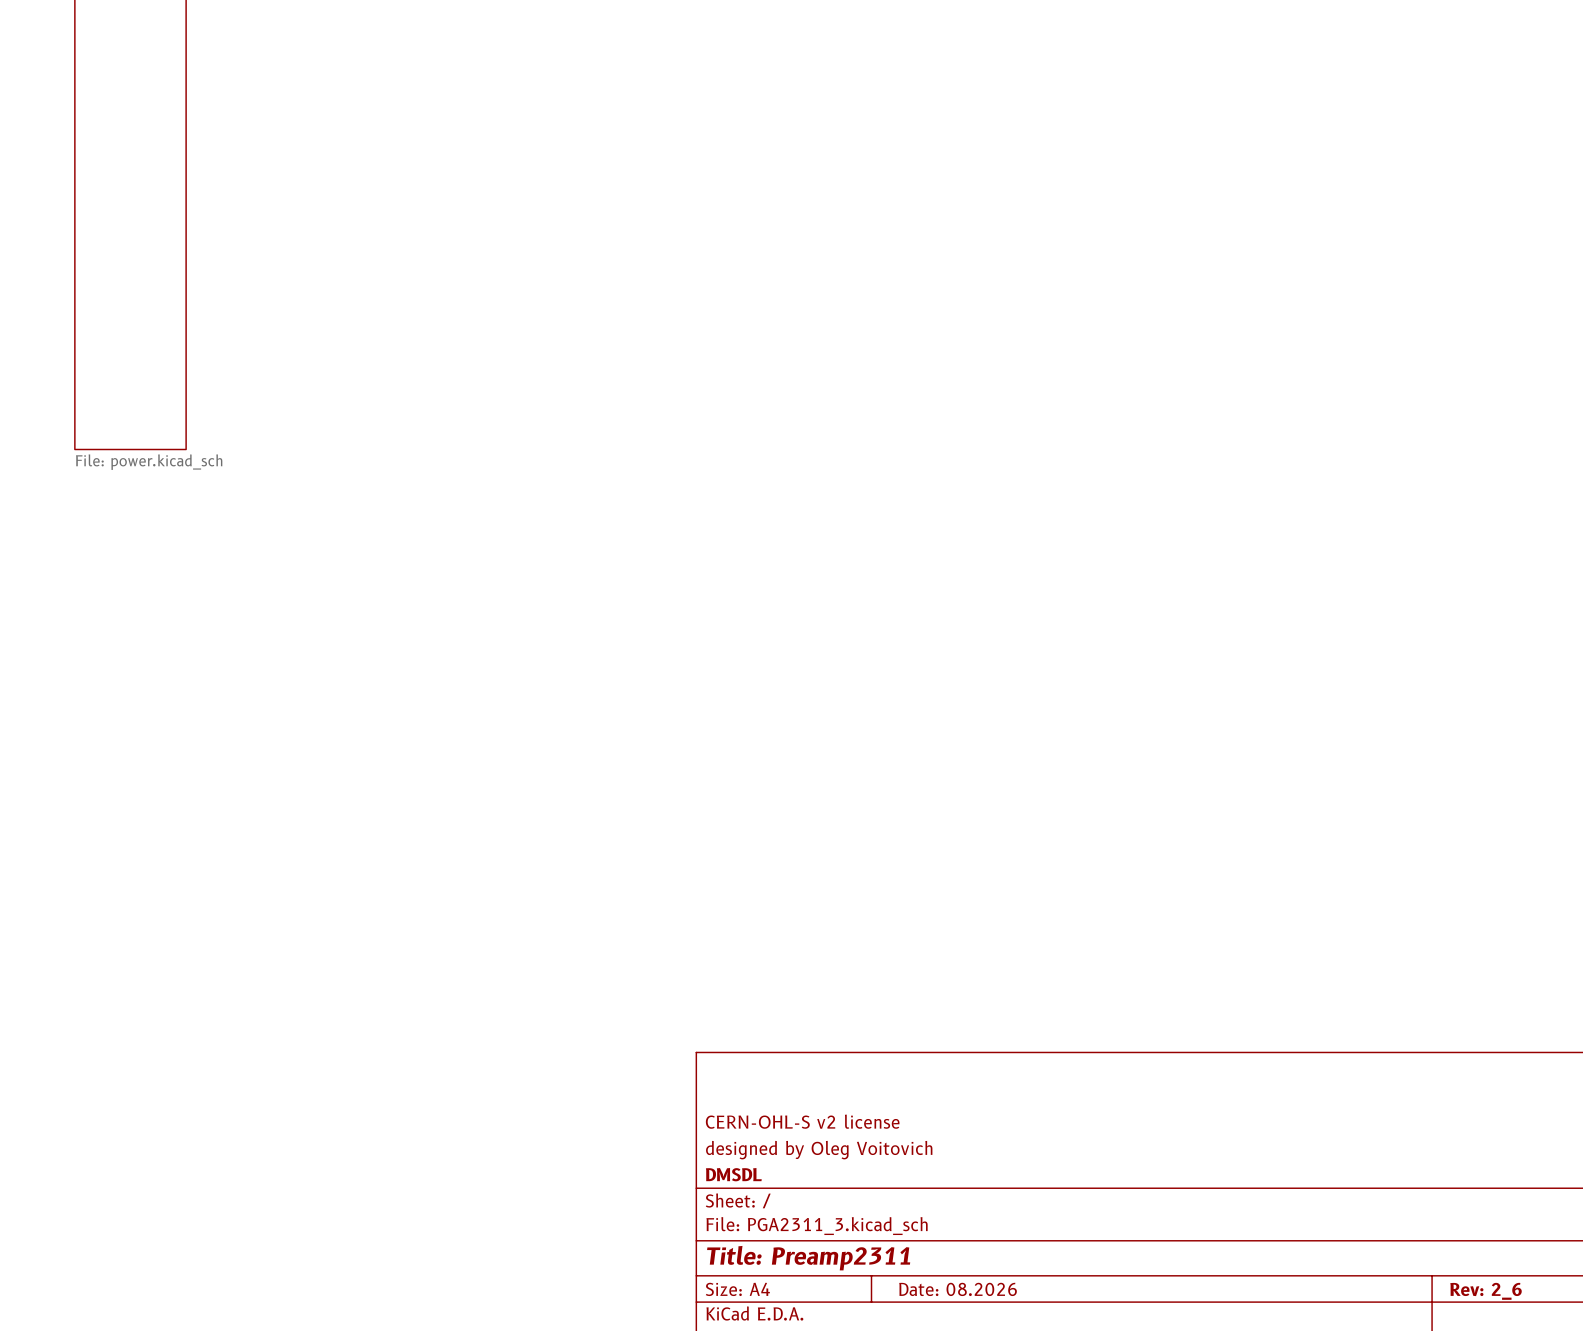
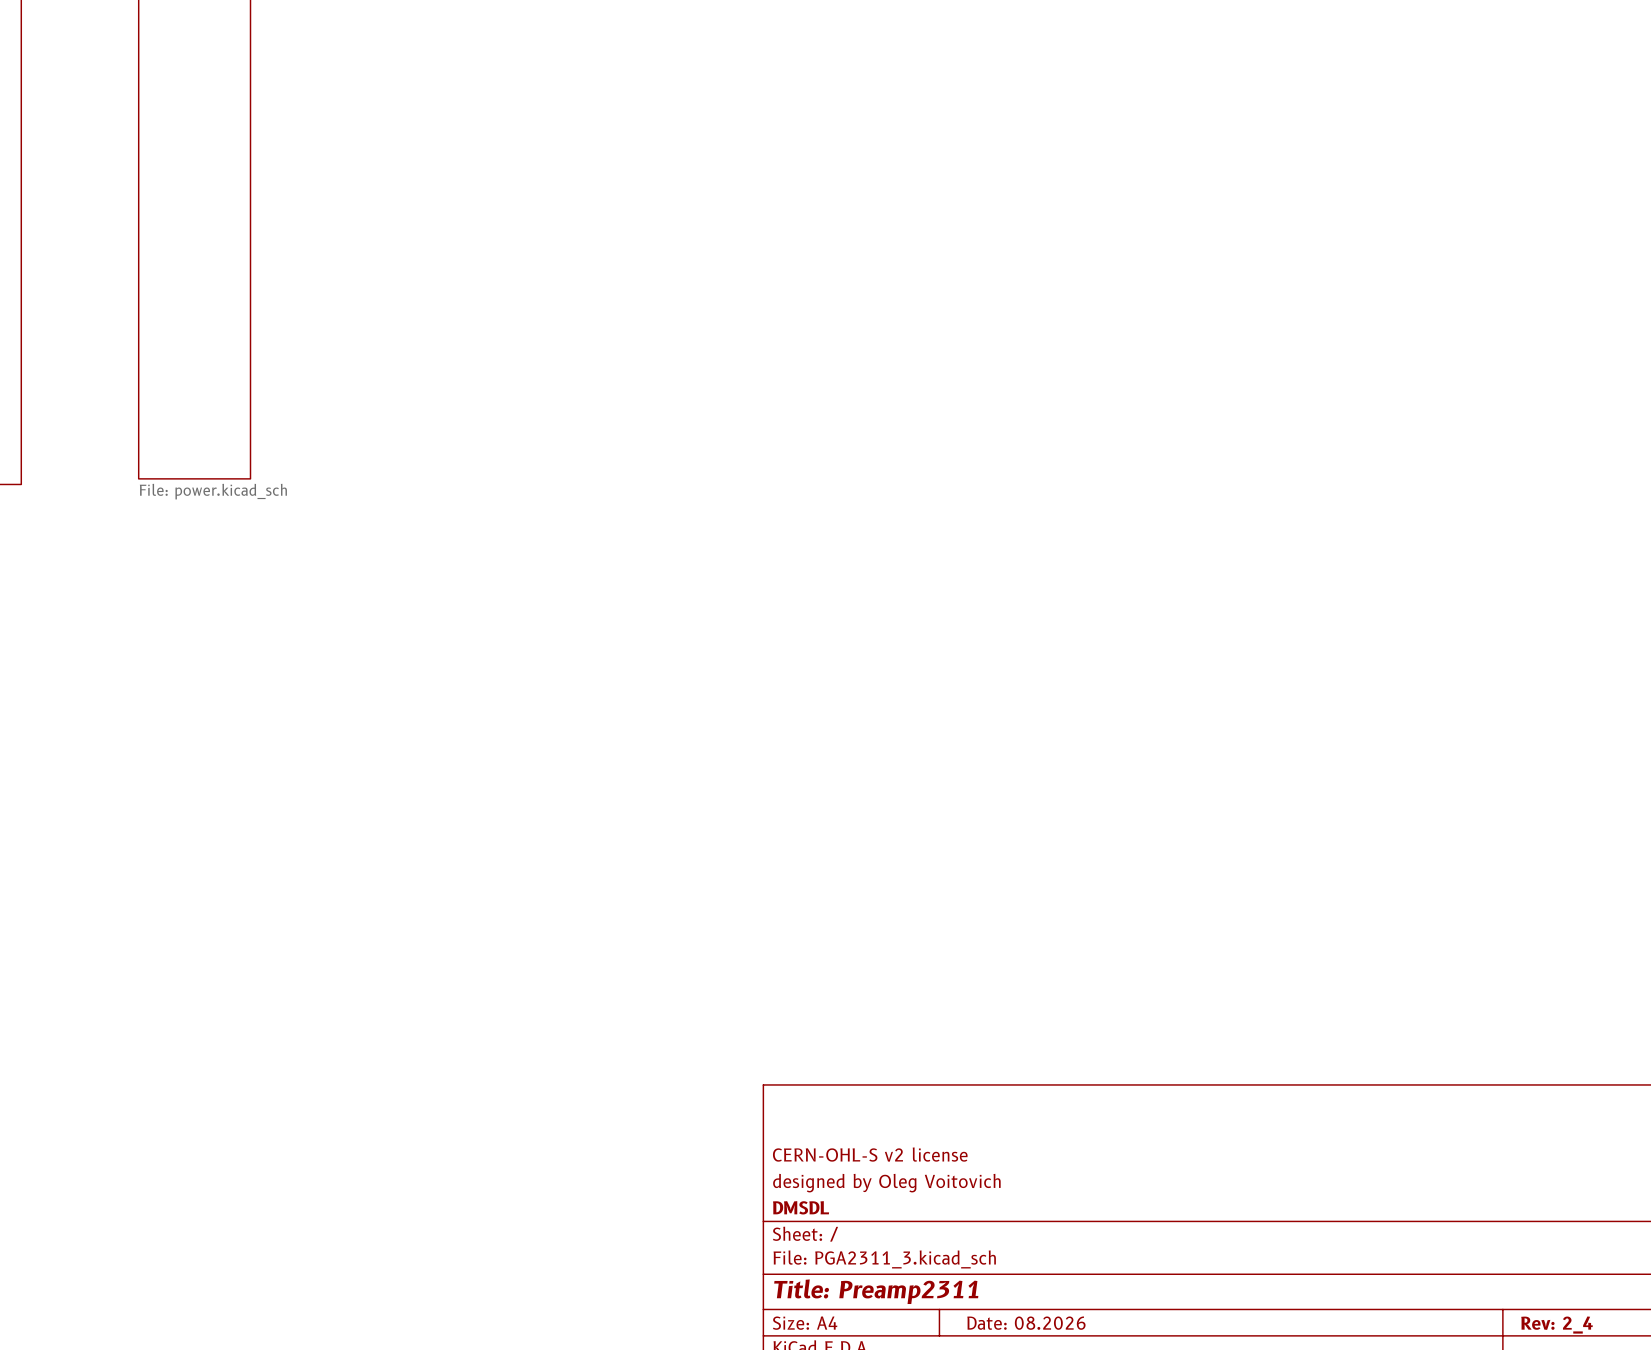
title block: Rev: 2_6 (1486, 1291) -> Rev: 2_4 (1557, 1325)

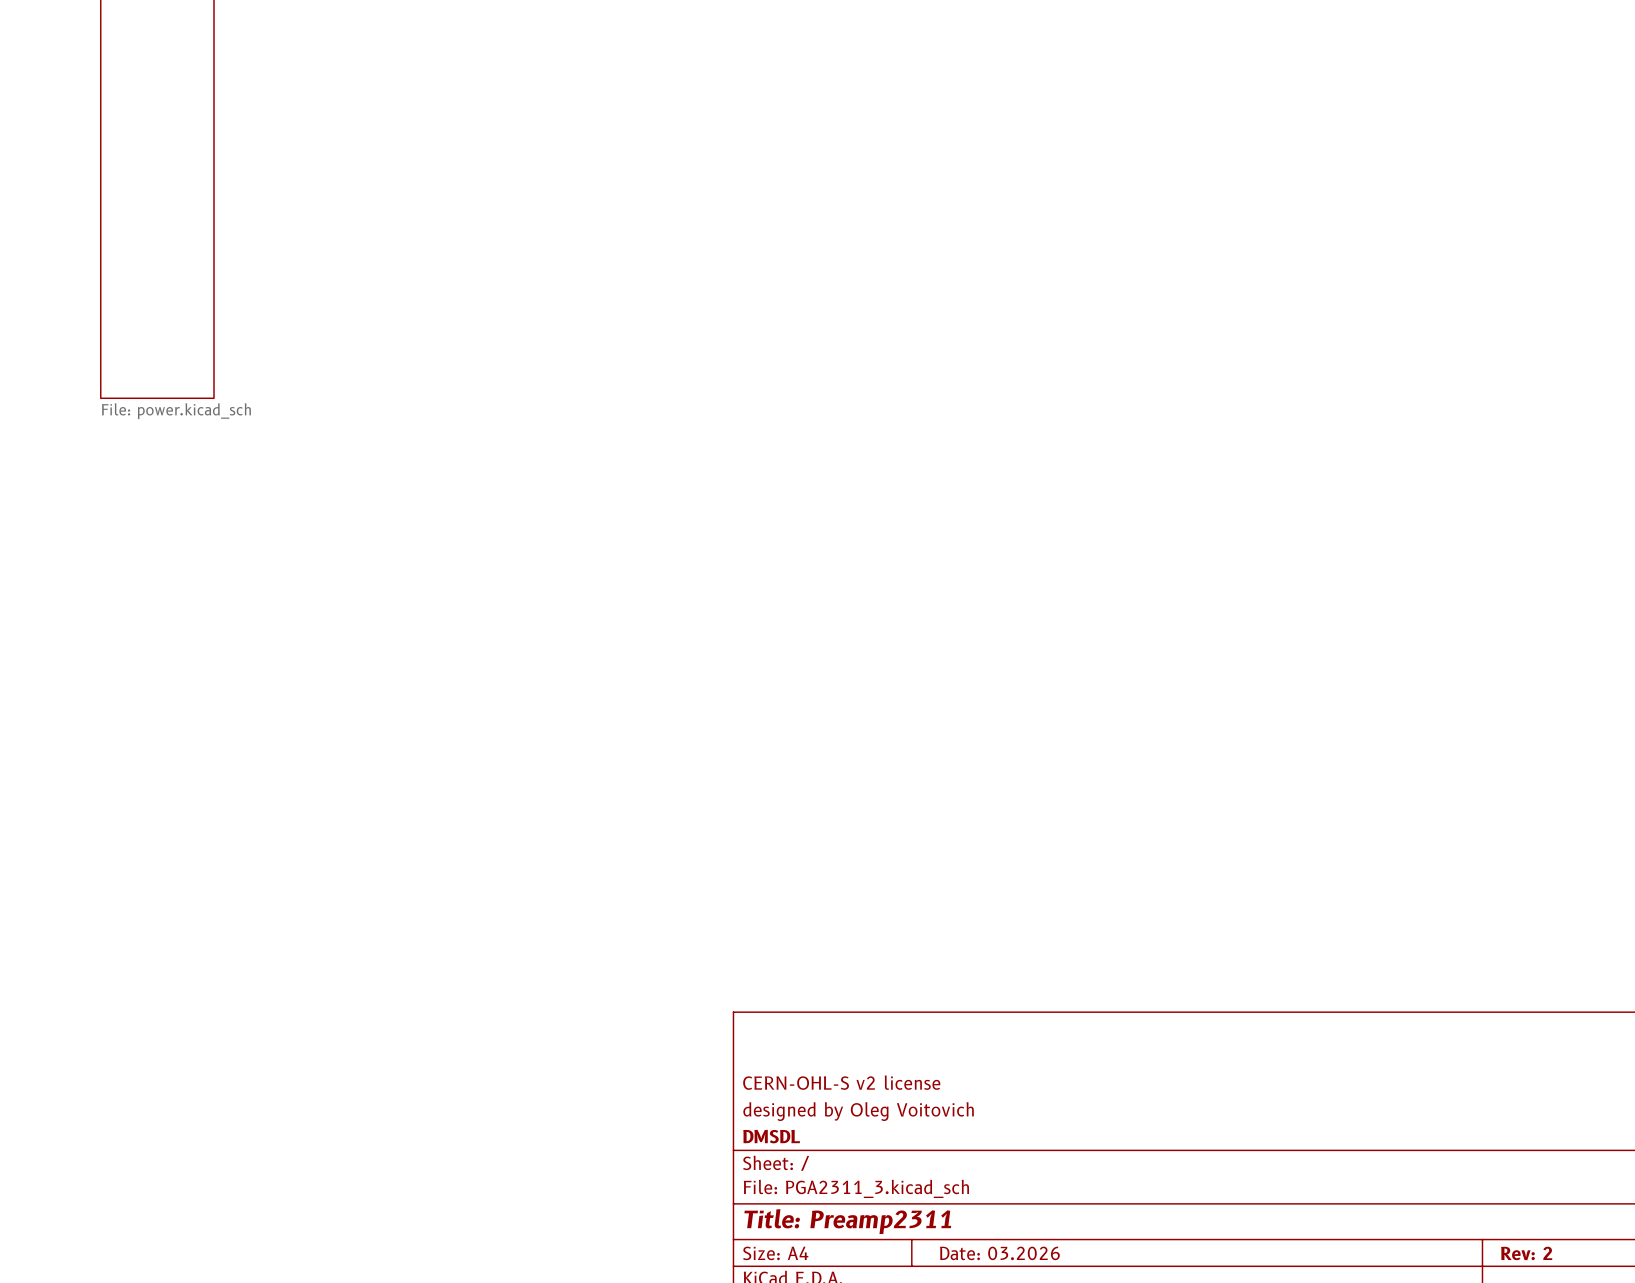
title block: Date: 08.2026 (1026, 1323) -> Date: 03.2026 (999, 1253)
title block: Rev: 2_4 (1557, 1325) -> Rev: 2 (1526, 1253)

